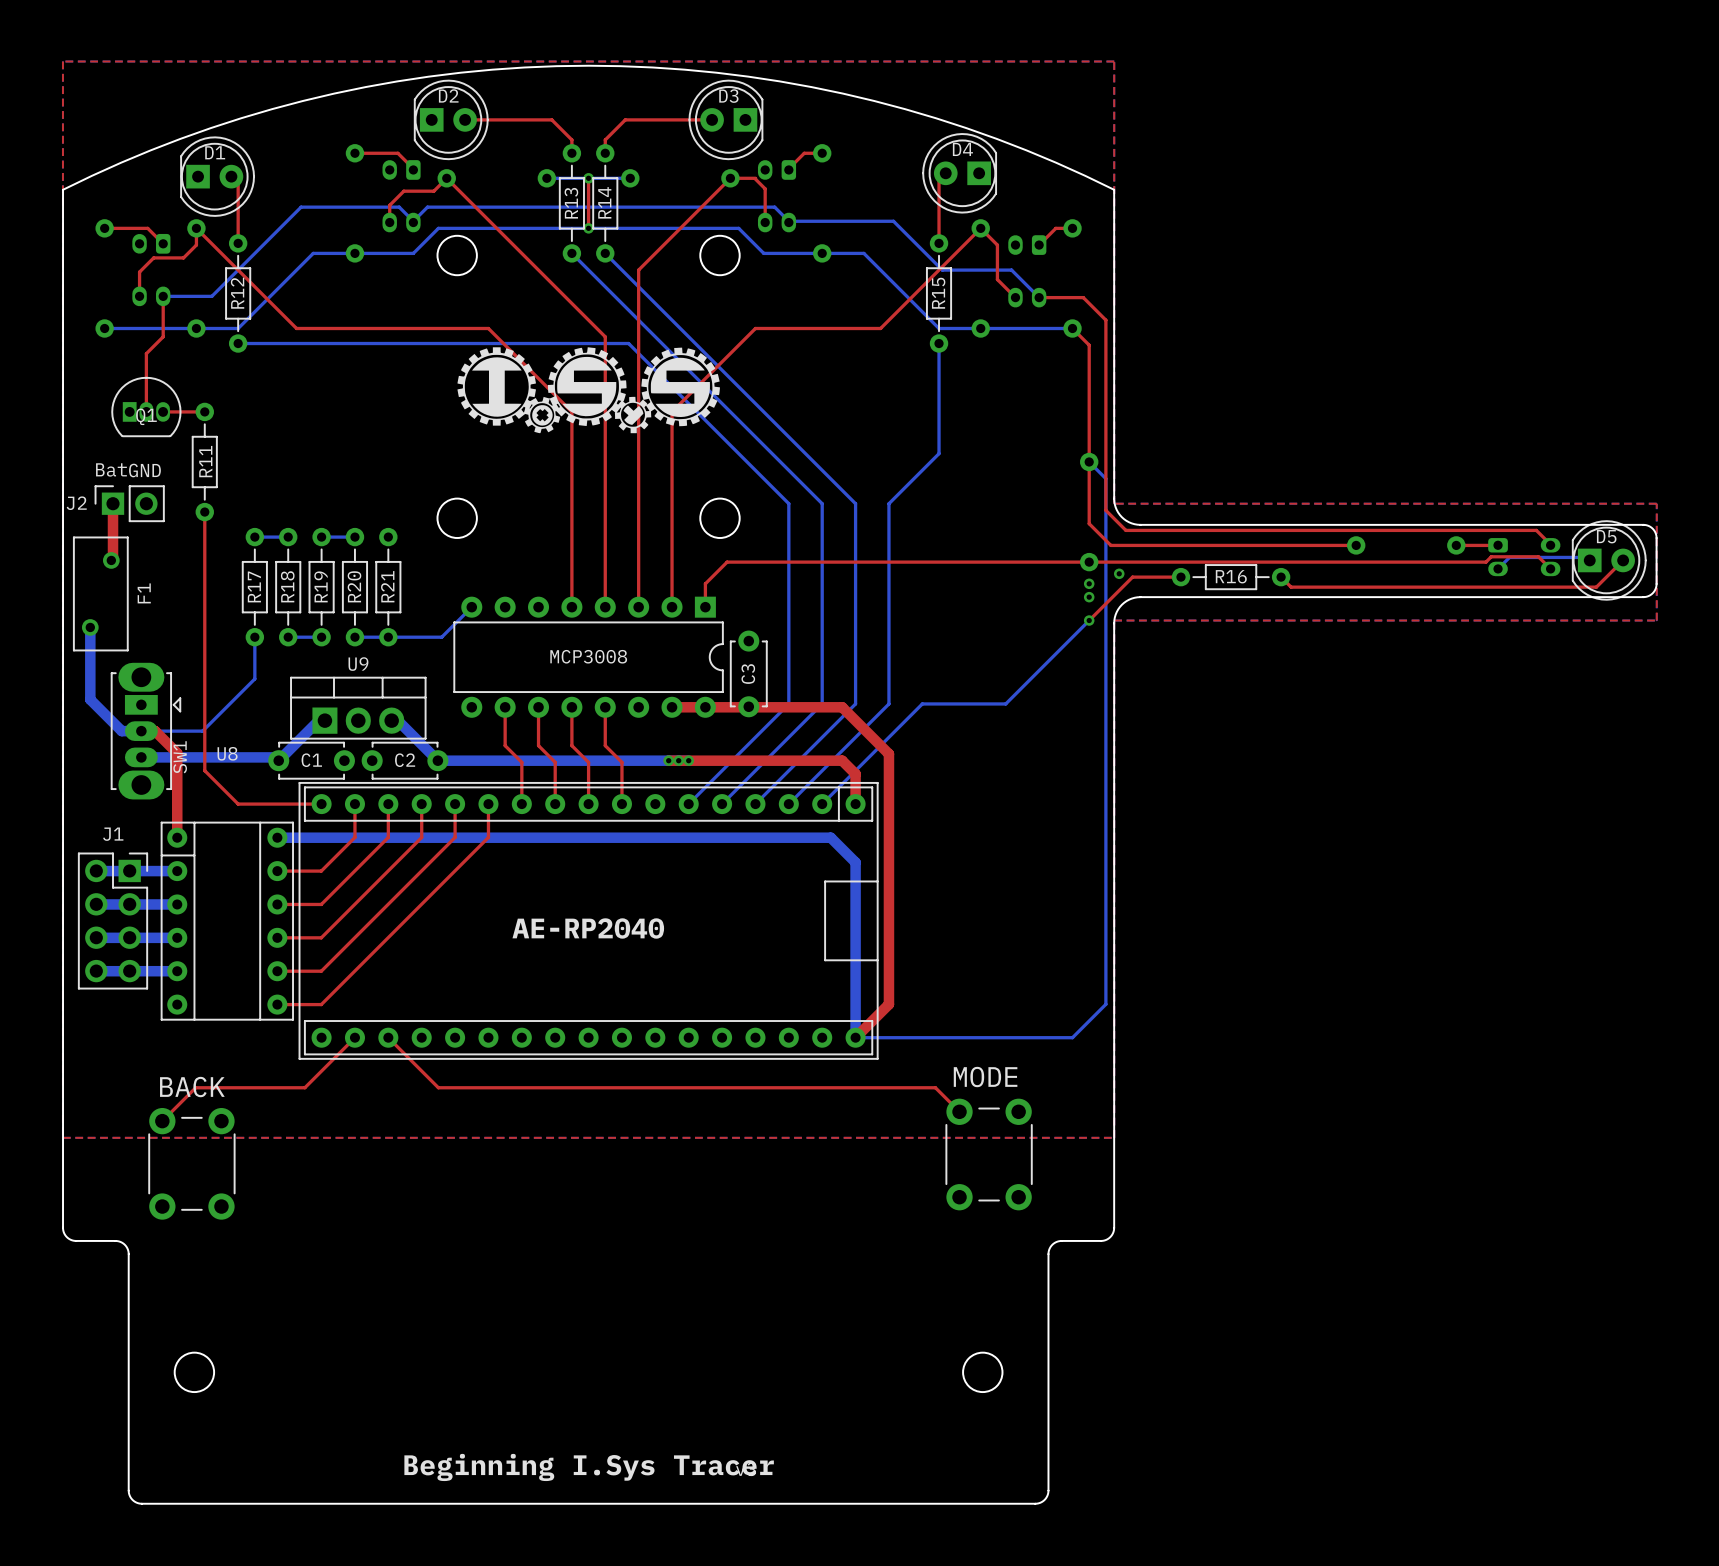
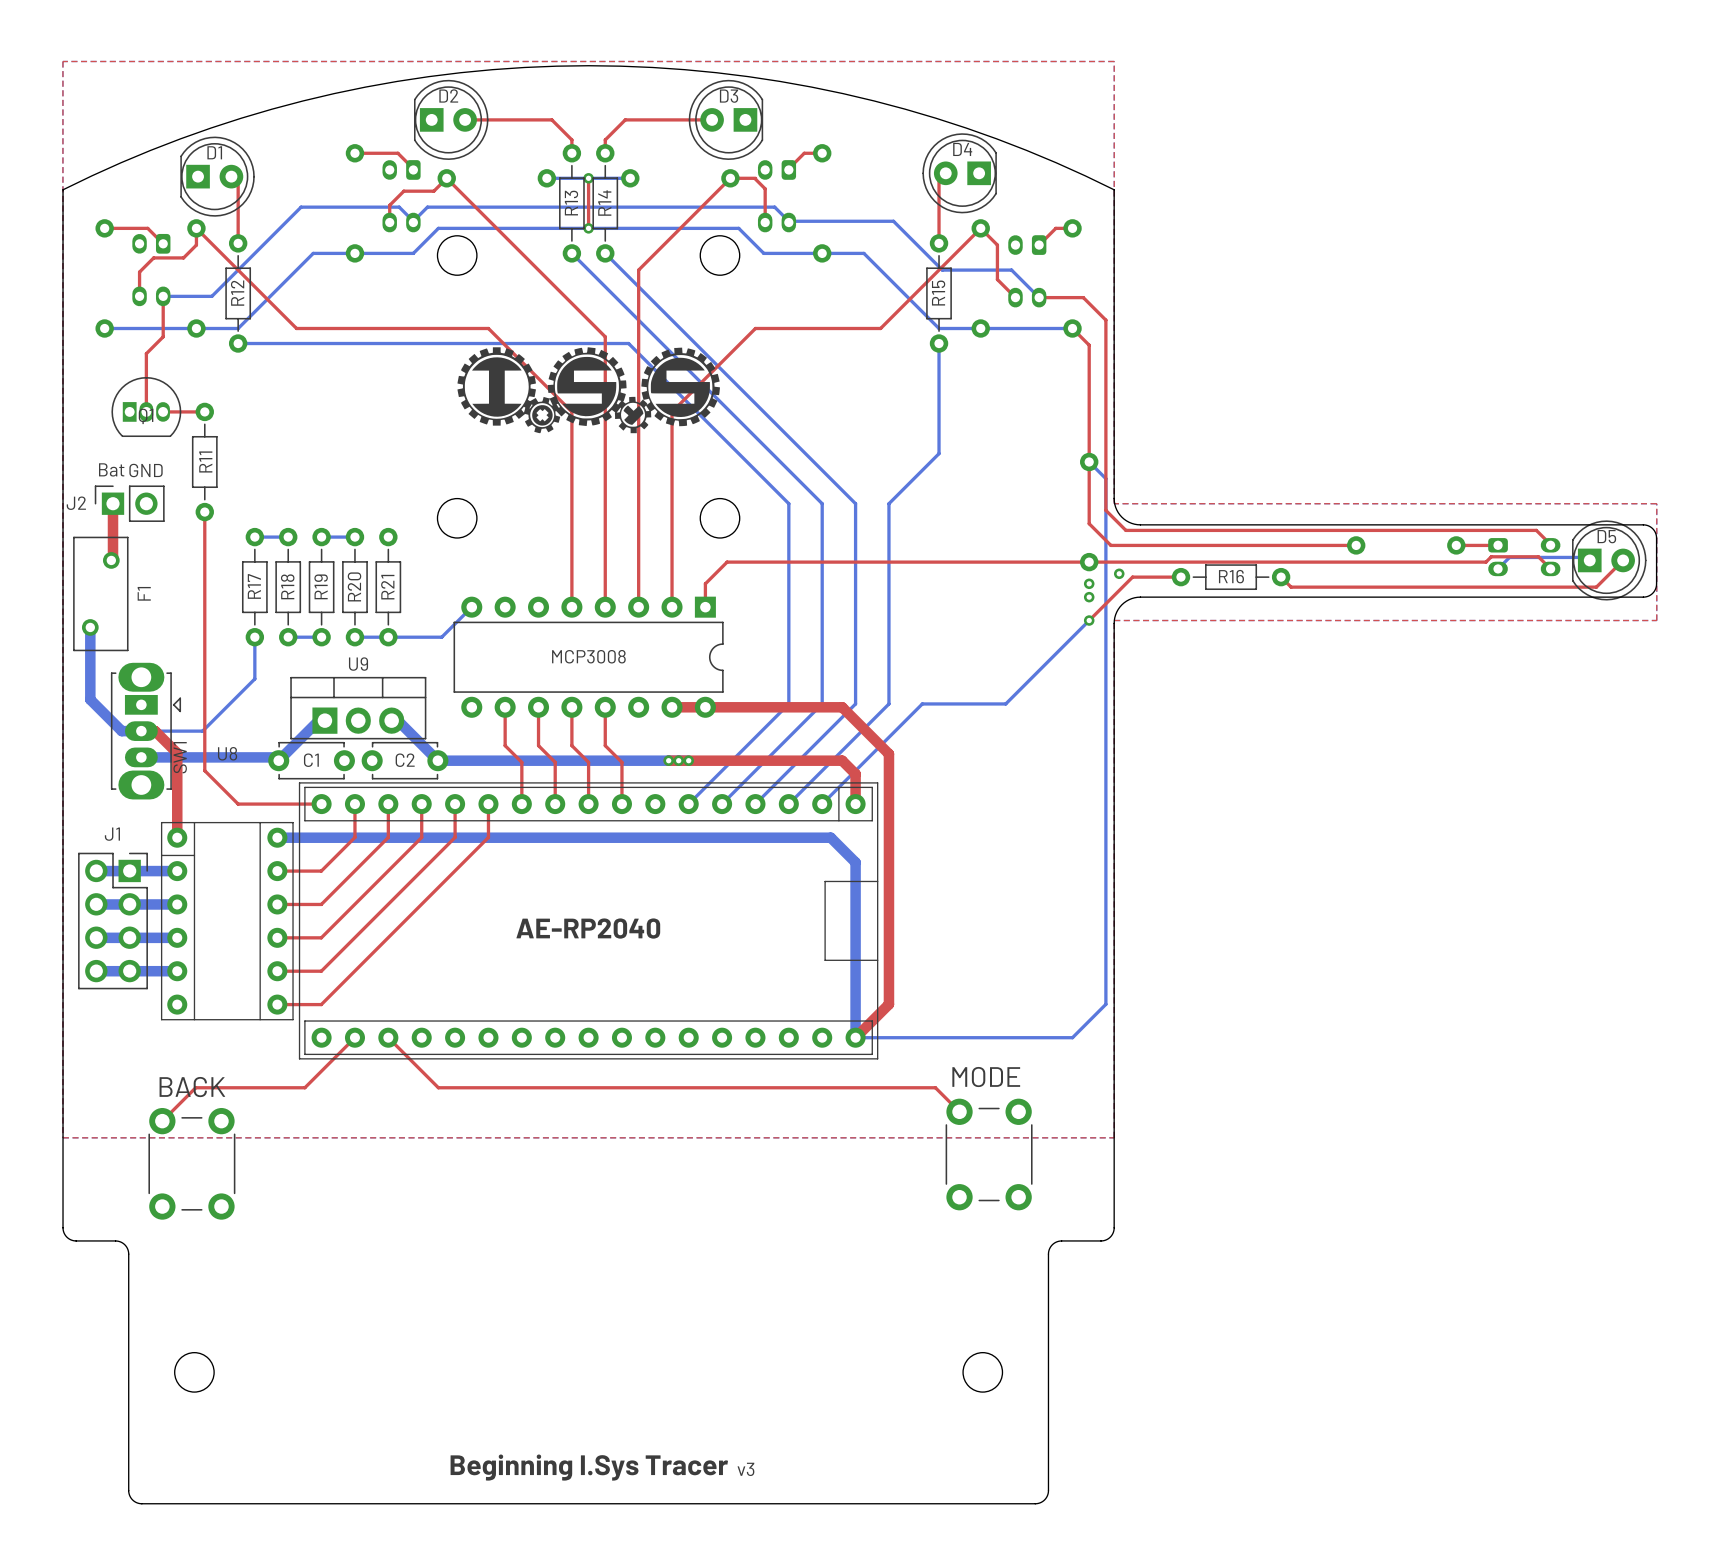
C3: (748, 673) -> none

